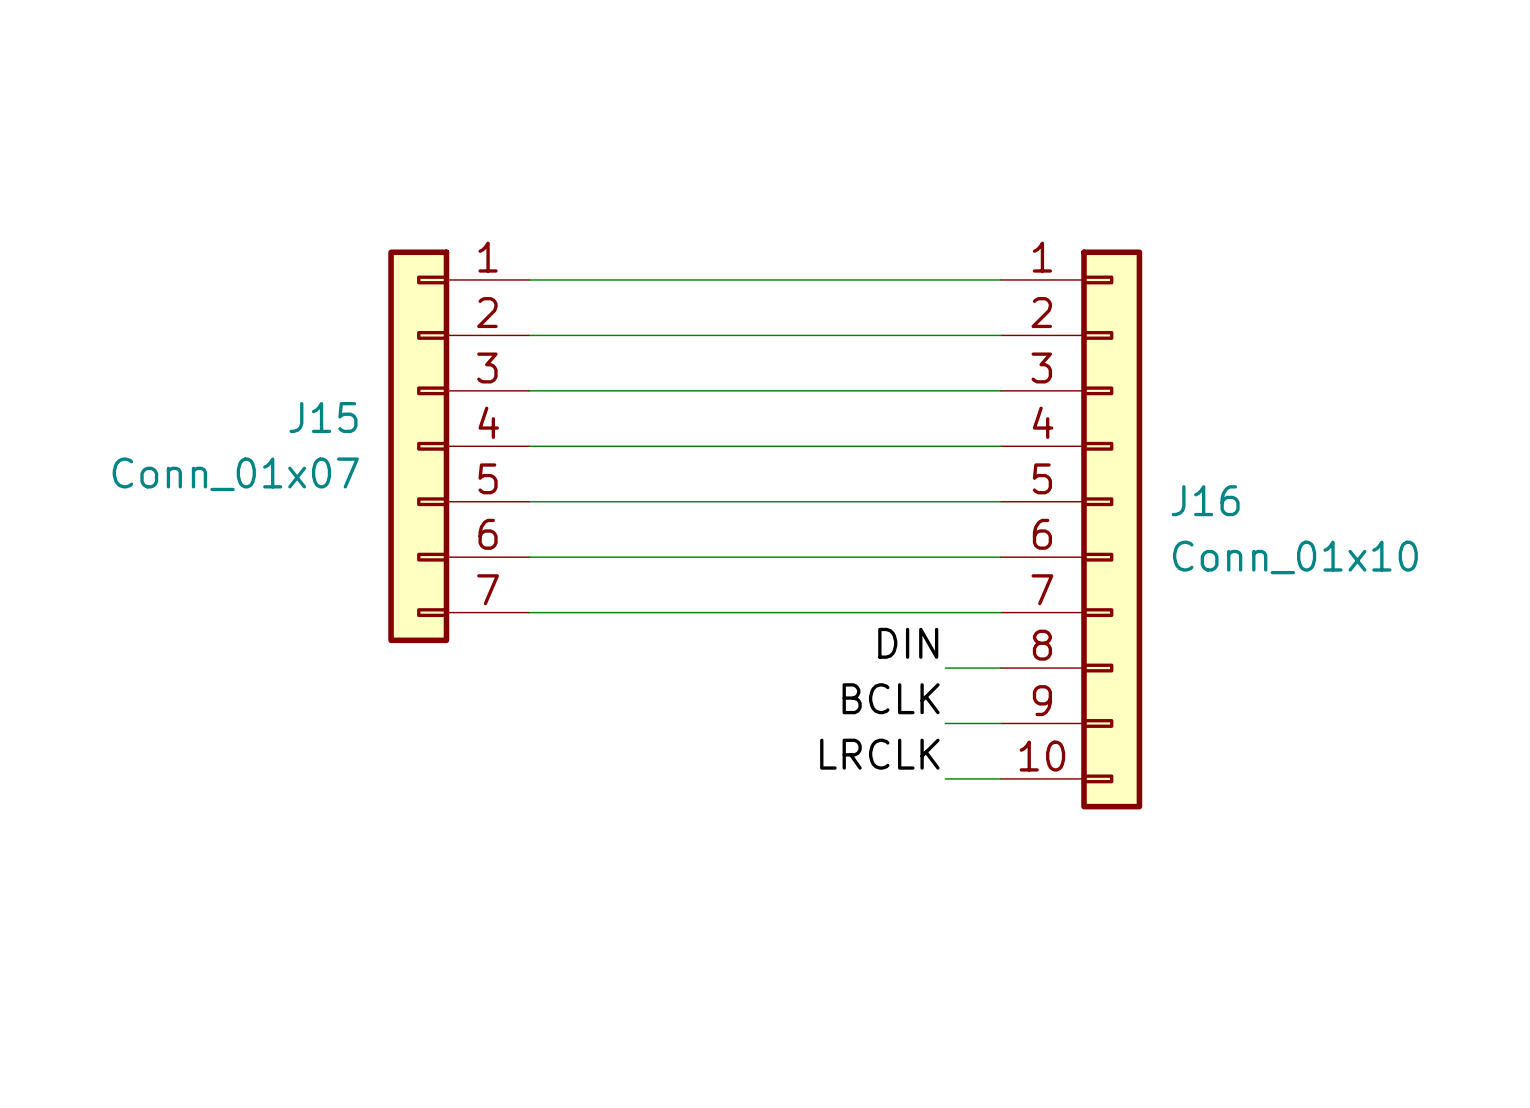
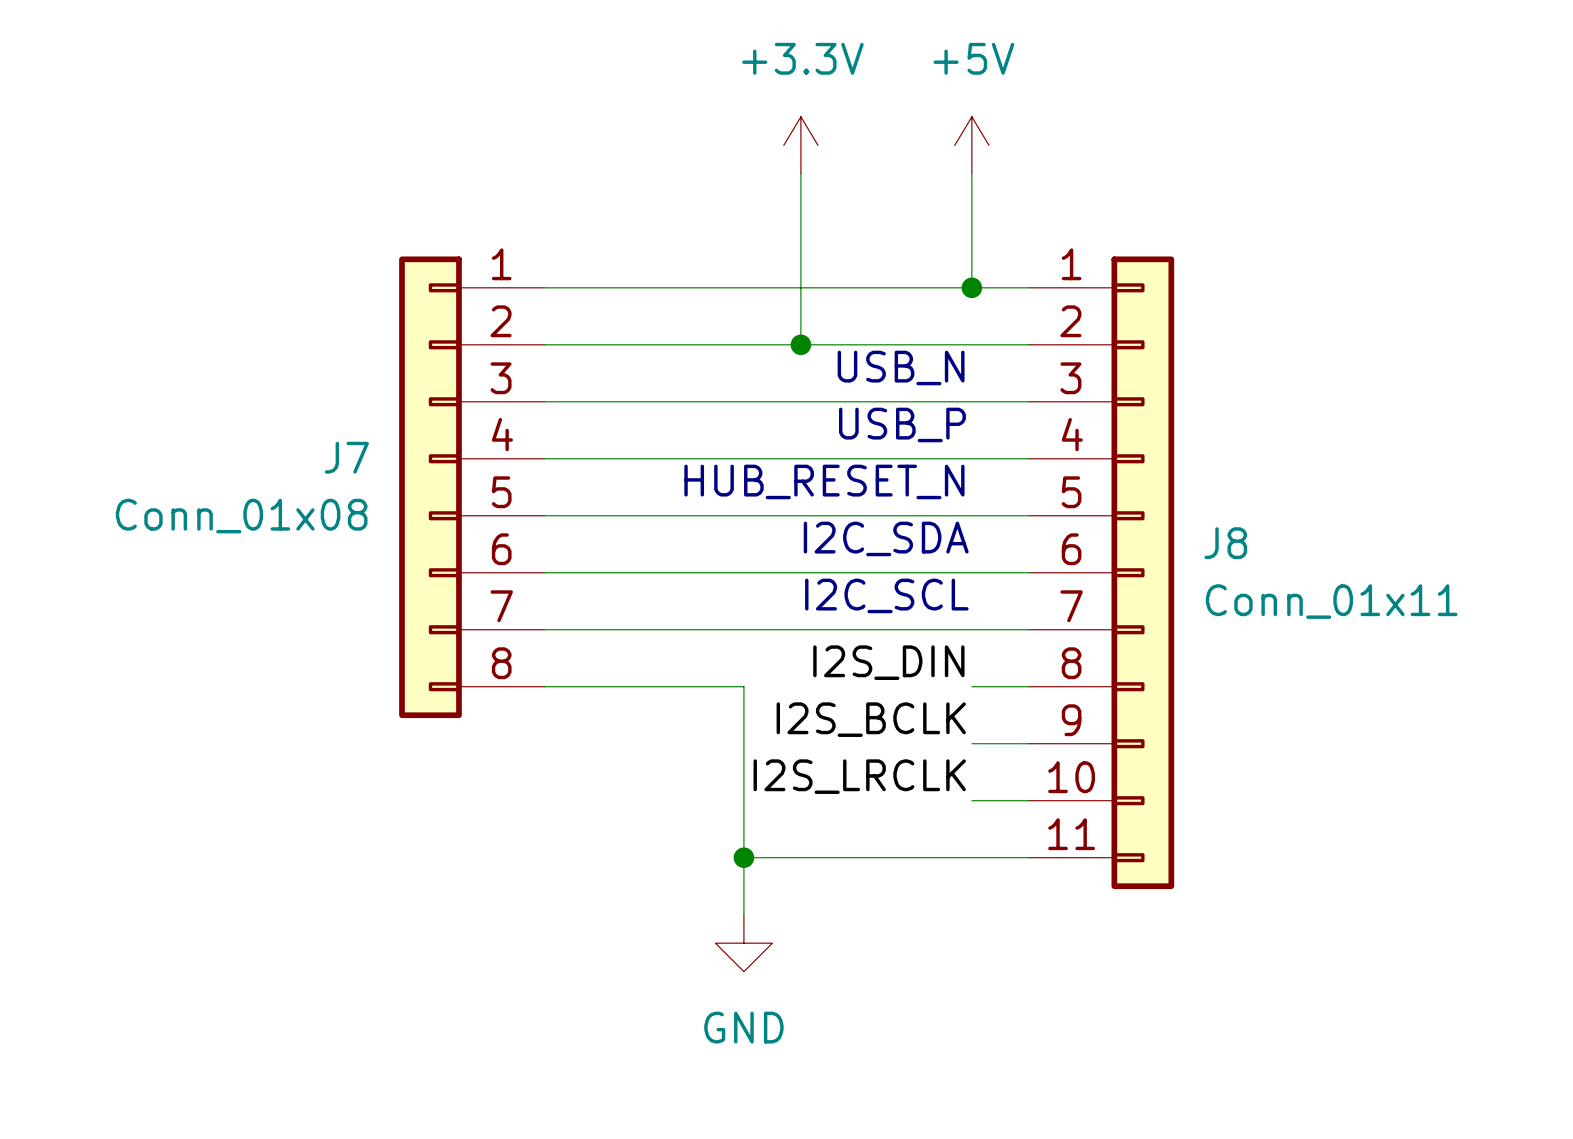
power symbol: none -> +3.3V (800, 145)
power symbol: none -> +5V (971, 145)
wire: none -> (800, 173) (800, 344)
wire: none -> (971, 173) (971, 287)
junction: none -> (971, 287)
junction: none -> (800, 344)
text: none -> USB_N (901, 367)
text: none -> USB_P (902, 424)
J15: Conn_01x07 (458, 446) -> none
text: none -> HUB_RESET_N (824, 481)
J7: none -> Conn_01x08 (471, 487)
text: none -> I2C_SDA (886, 538)
J16: Conn_01x10 (1071, 529) -> none
J8: none -> Conn_01x11 (1101, 572)
text: none -> I2C_SCL (886, 595)
label: DIN (908, 643) -> I2S_DIN (888, 662)
wire: none -> (544, 686) (743, 686) (743, 914)
label: BCLK (891, 698) -> I2S_BCLK (871, 719)
label: LRCLK (879, 754) -> I2S_LRCLK (859, 776)
wire: none -> (743, 857) (1028, 857)
junction: none -> (743, 857)
power symbol: none -> GND (743, 943)

